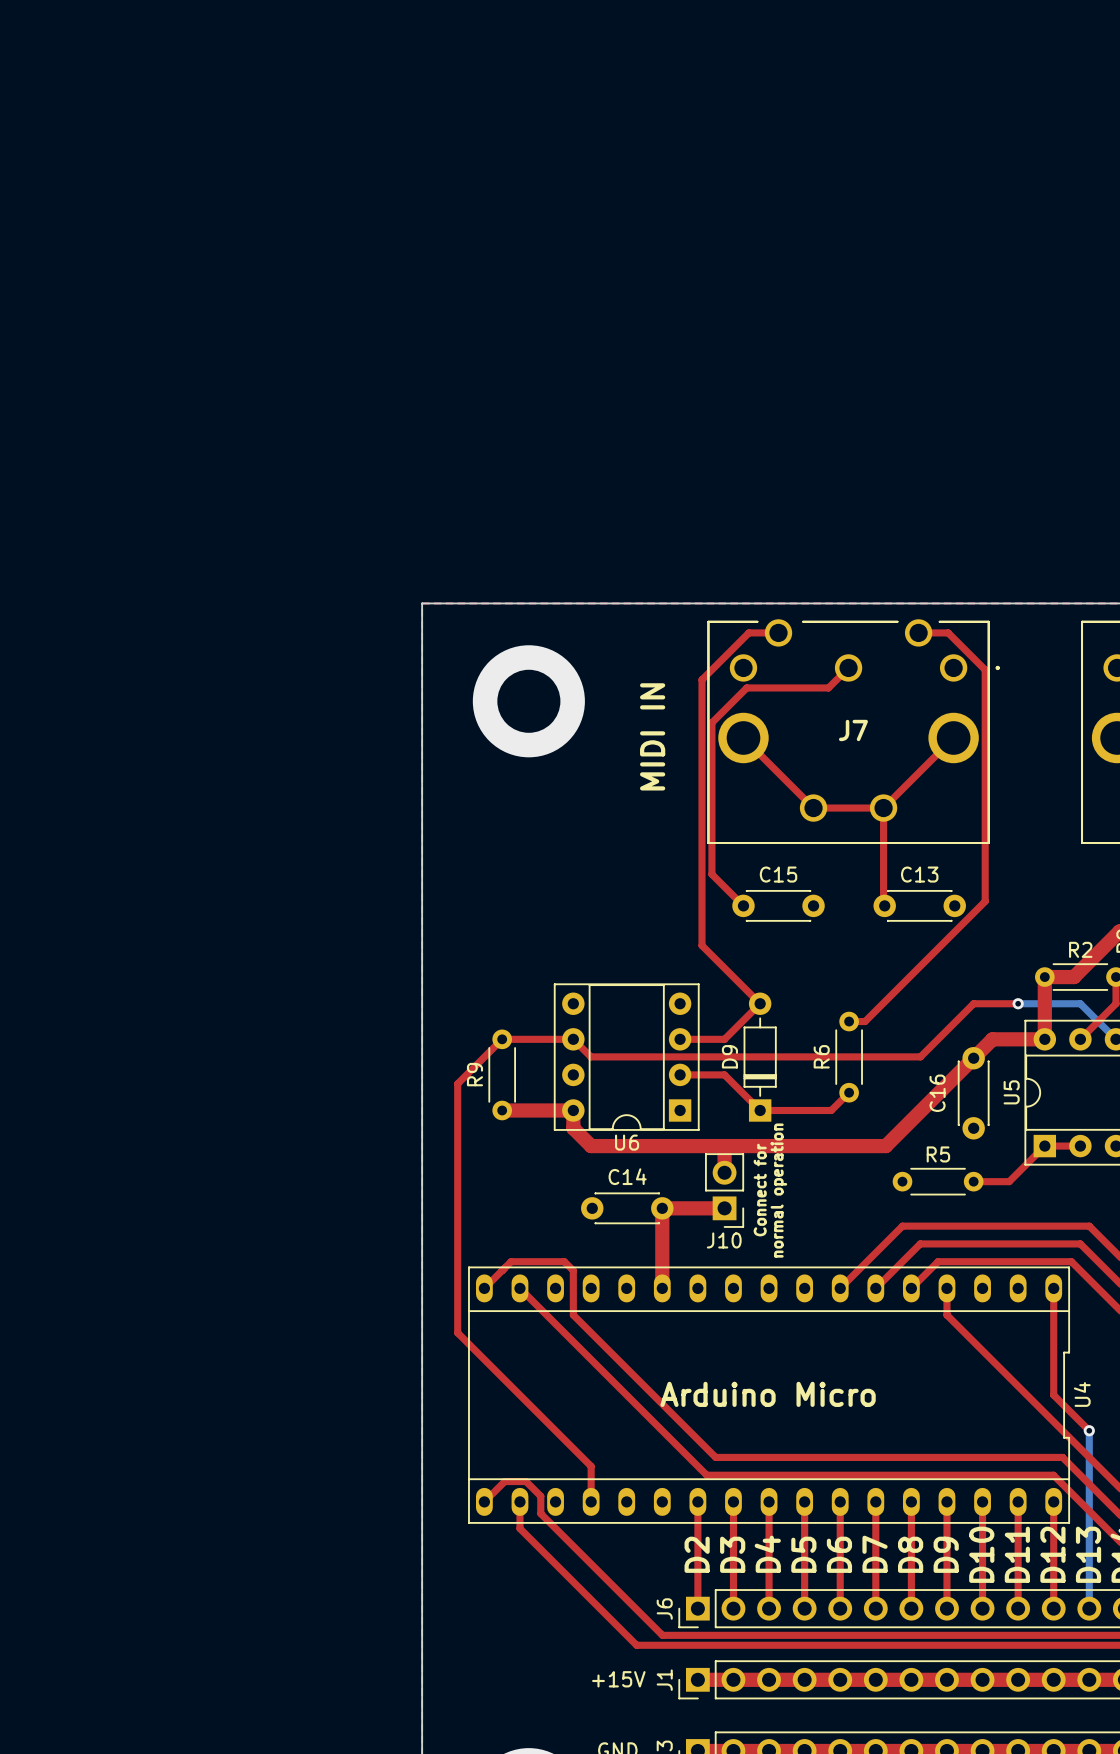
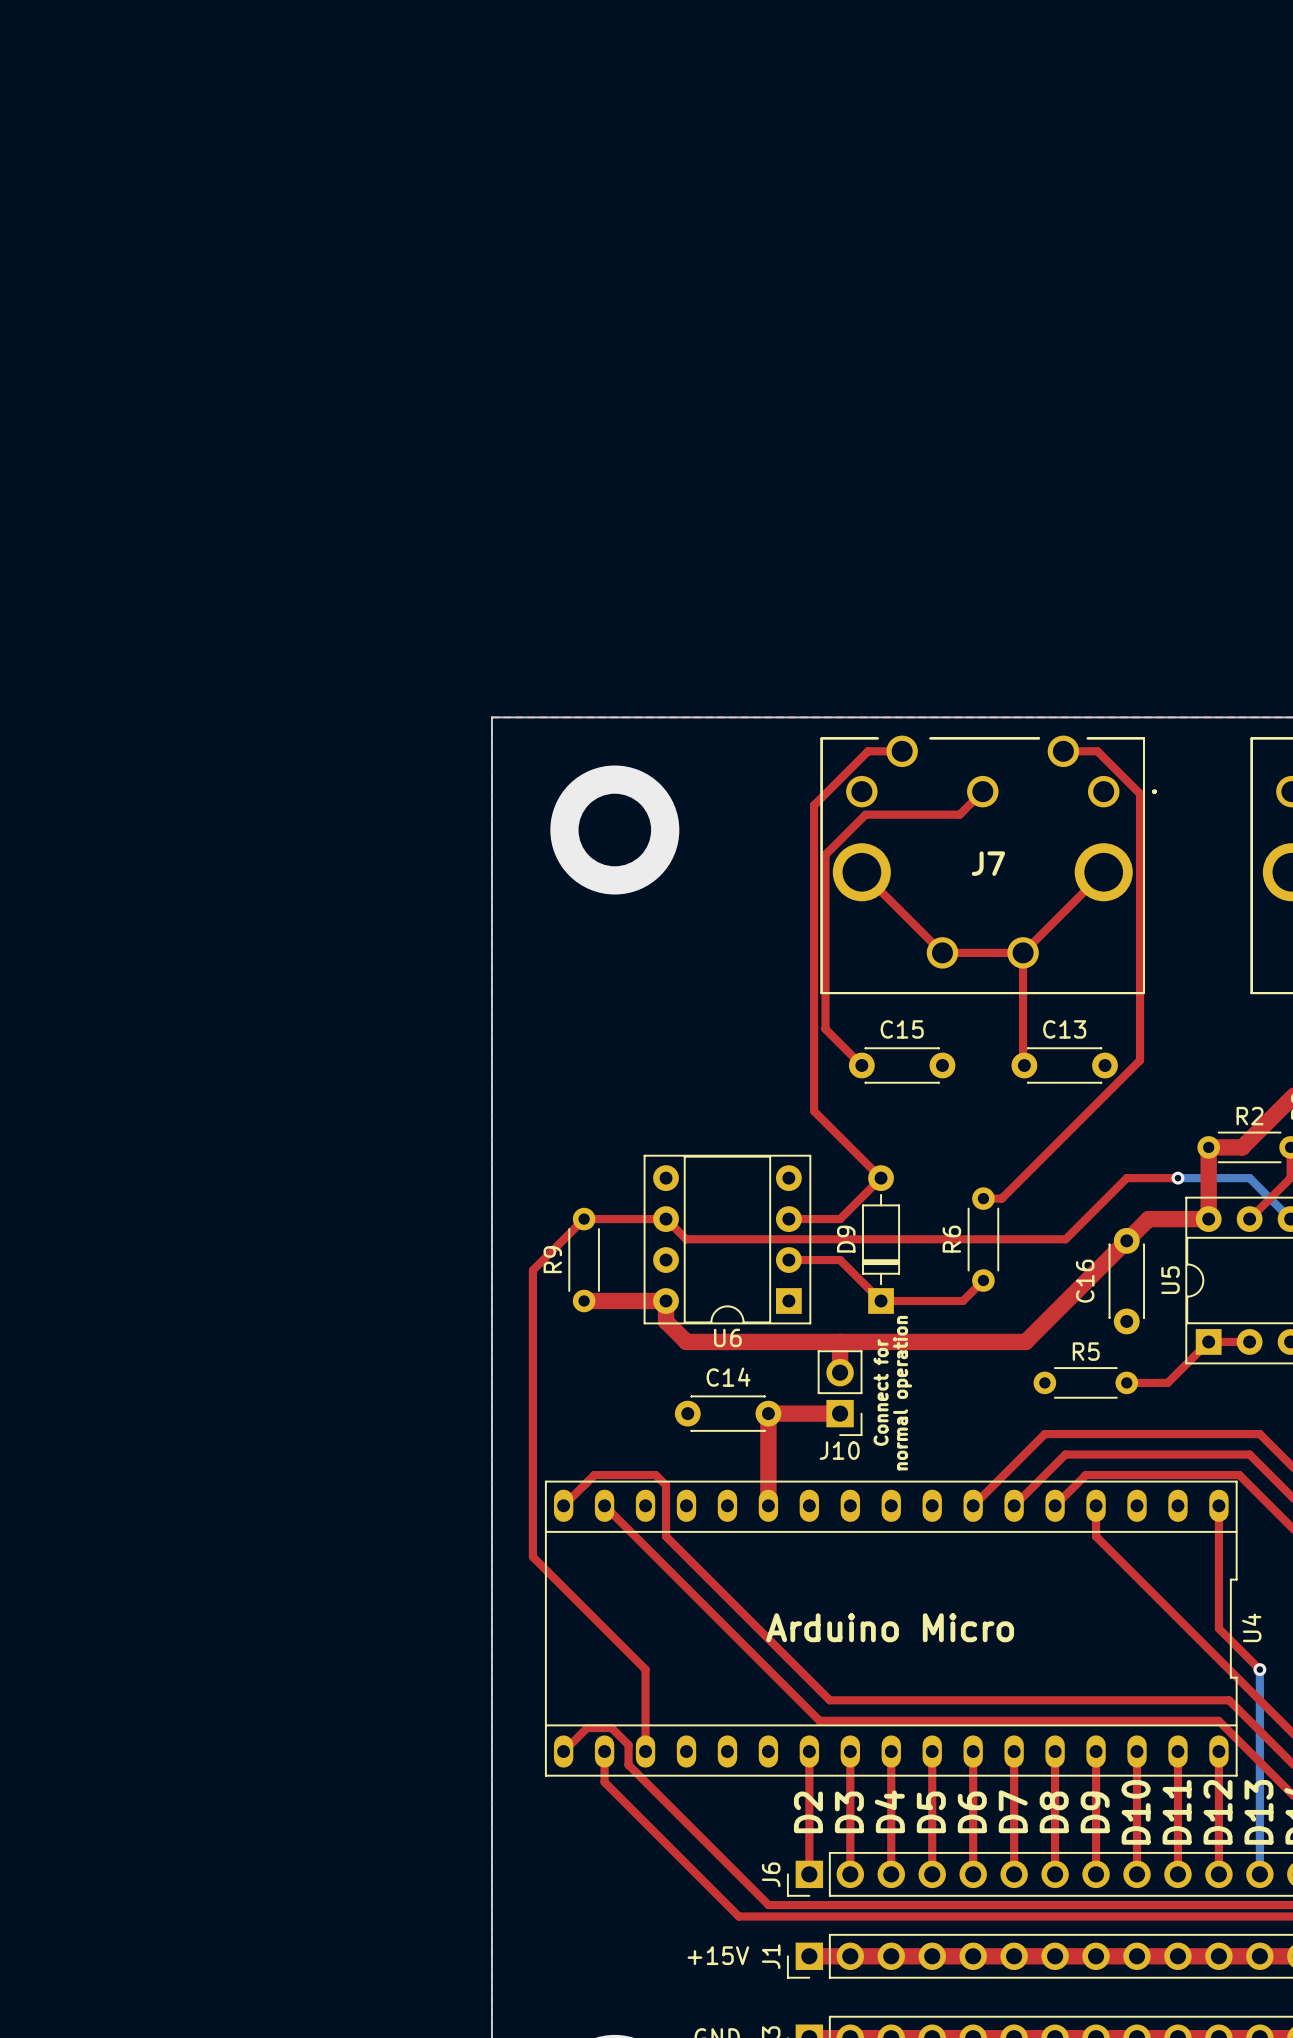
text: MIDI IN (652, 736) -> none
top track: (555, 1430) (591, 1466) (591, 1501) -> (645, 1669) (645, 1751)

